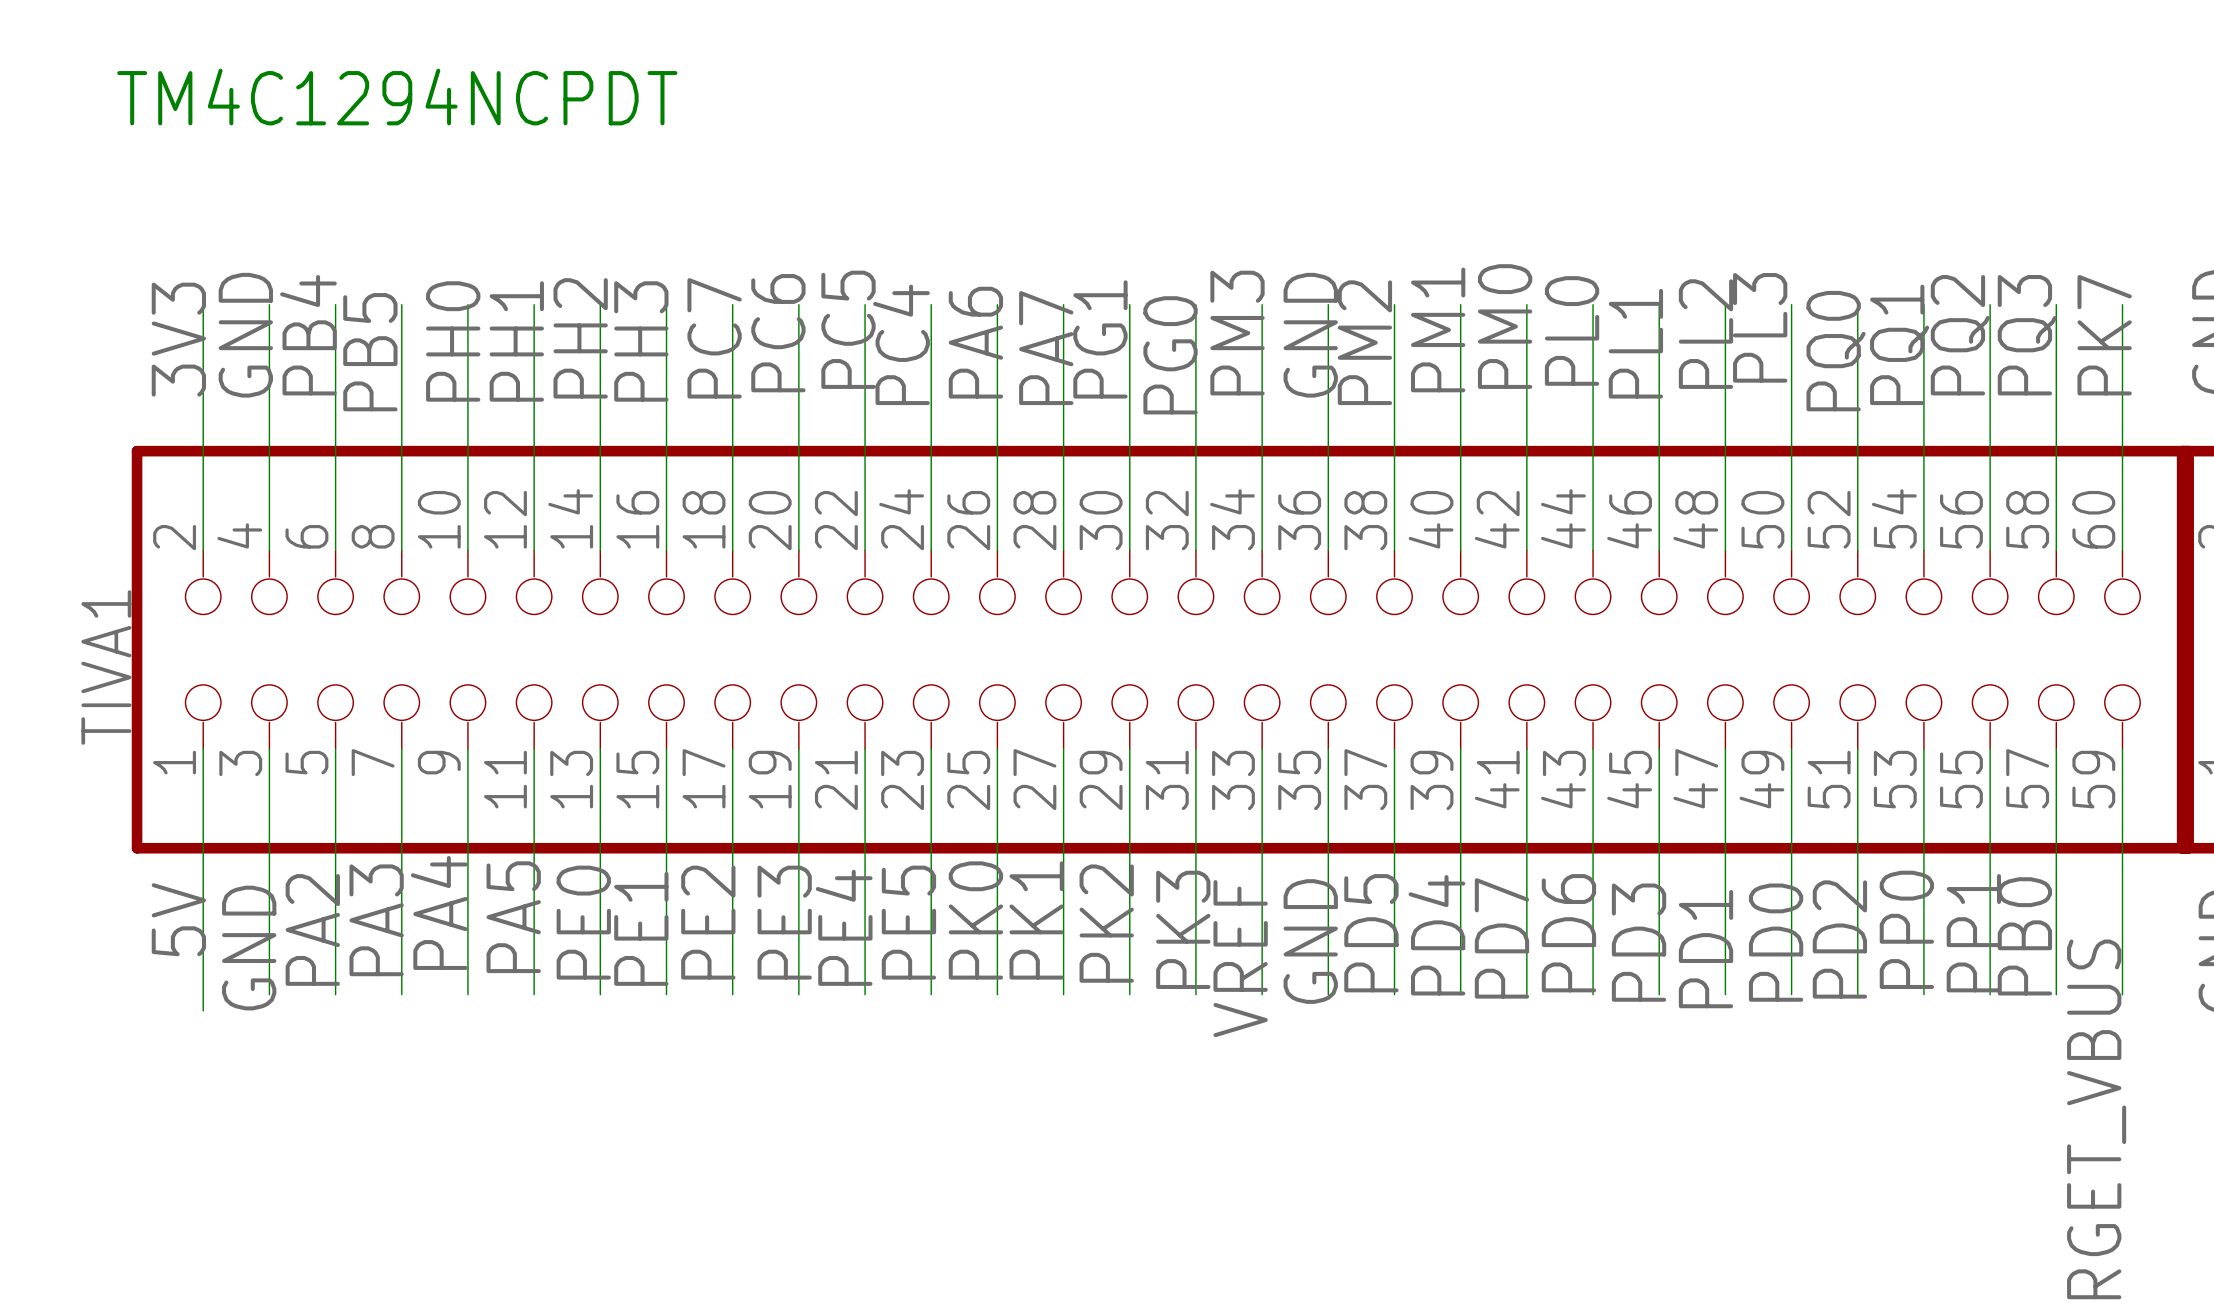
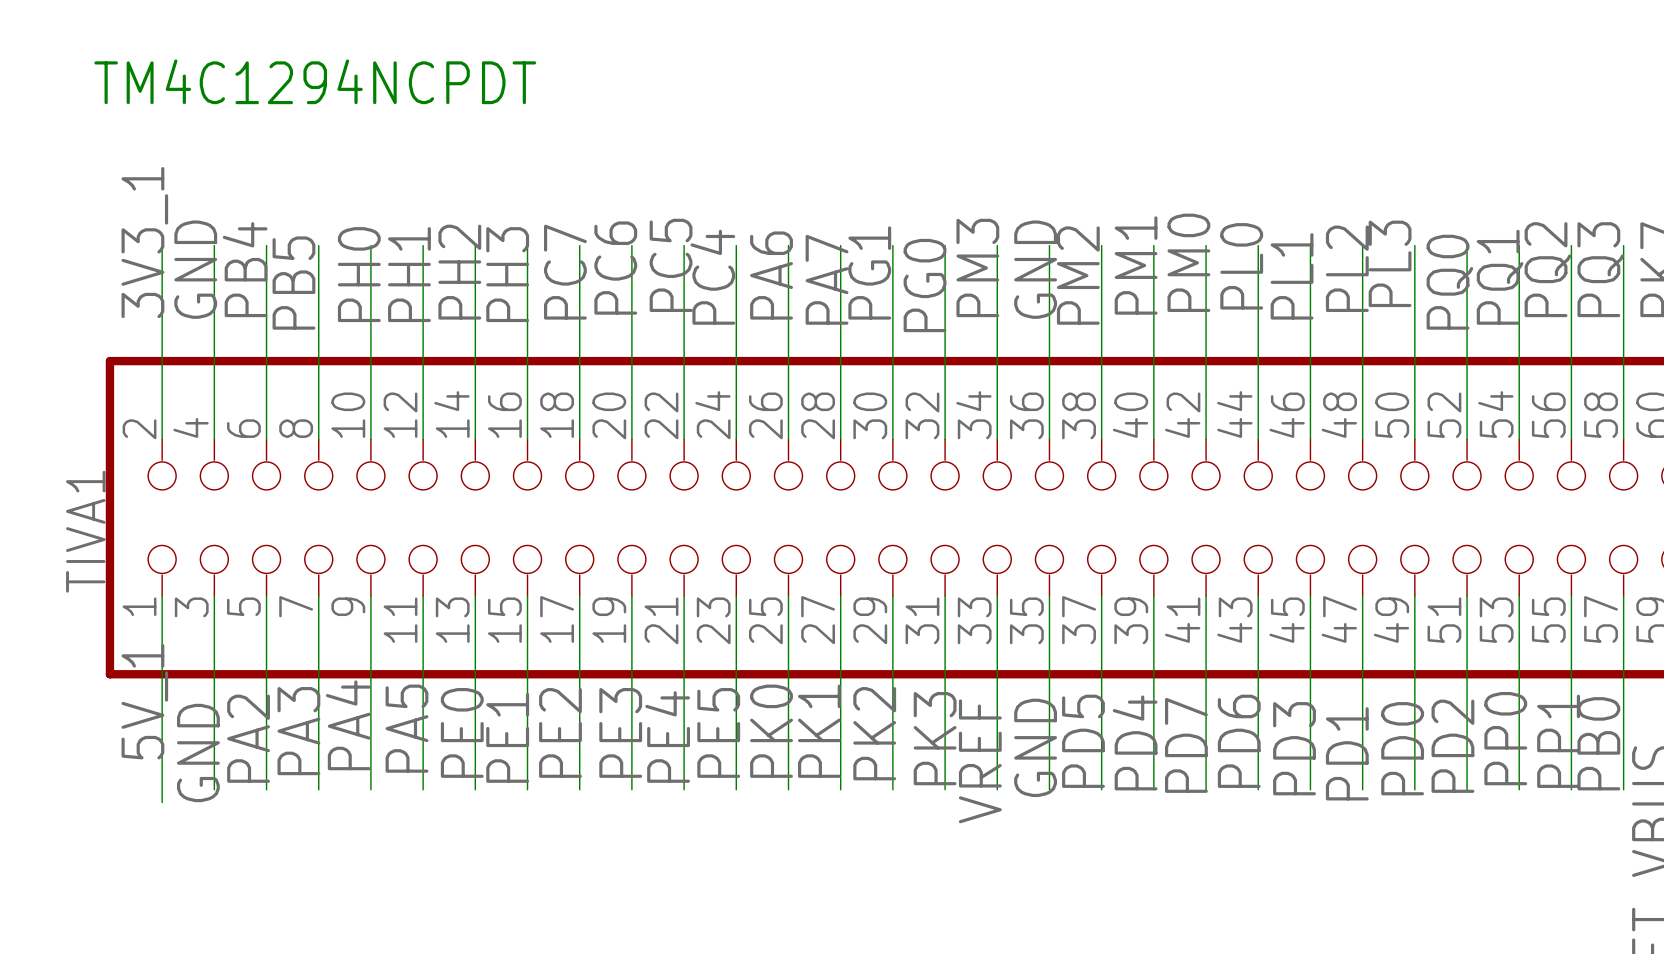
label: 3V3 (178, 339) -> 3V3_1 (144, 242)
label: 5V (178, 919) -> 5V_1 (144, 701)

